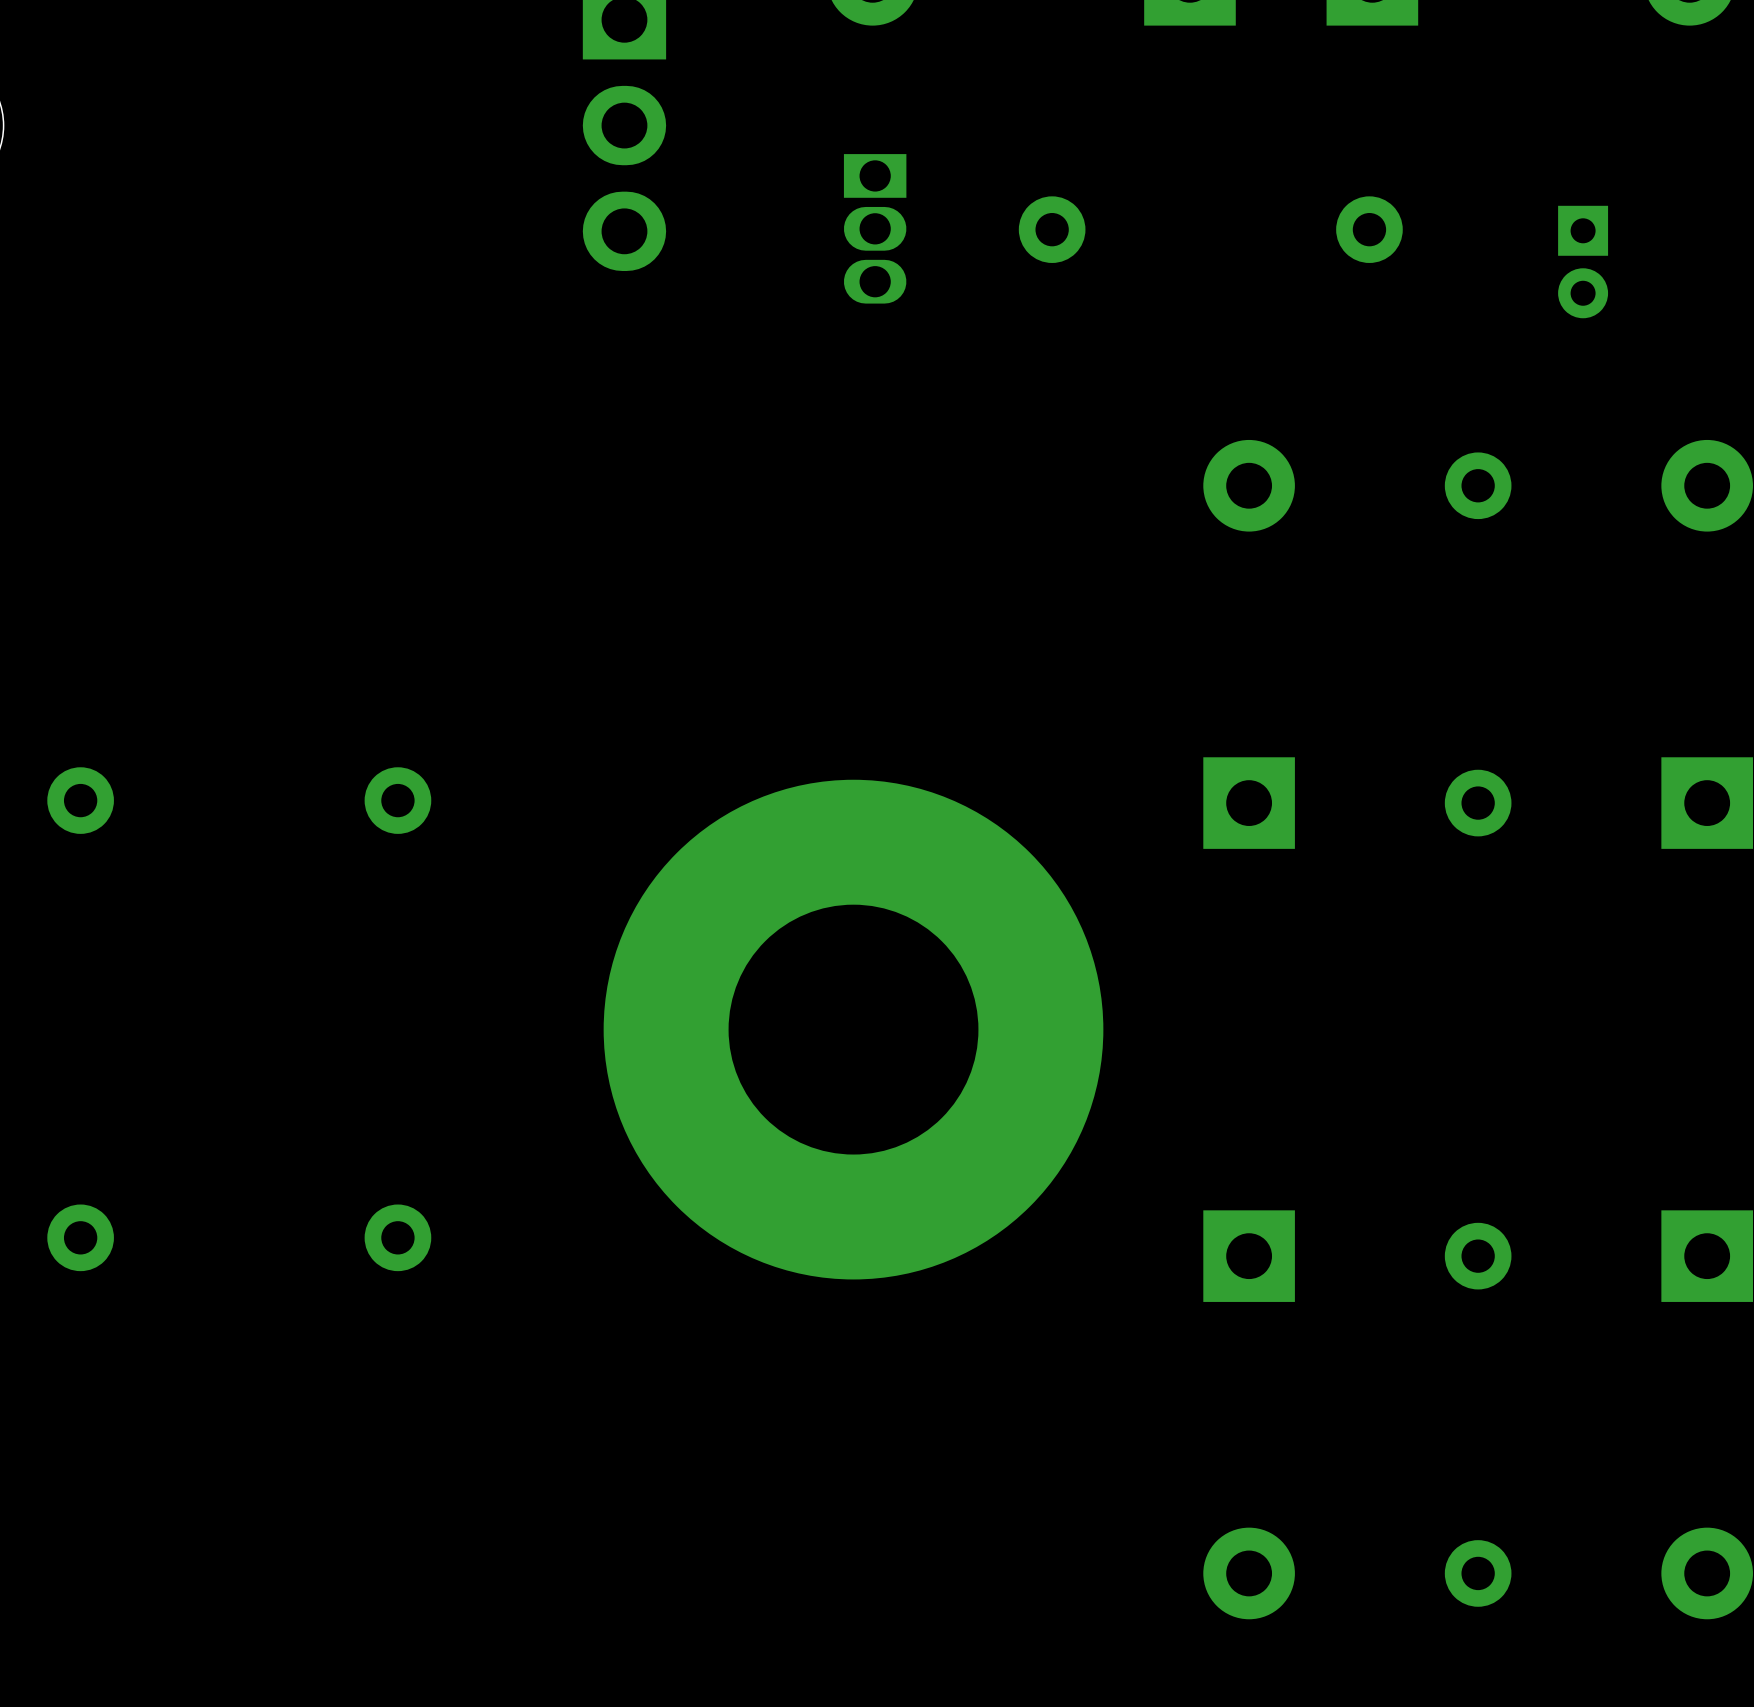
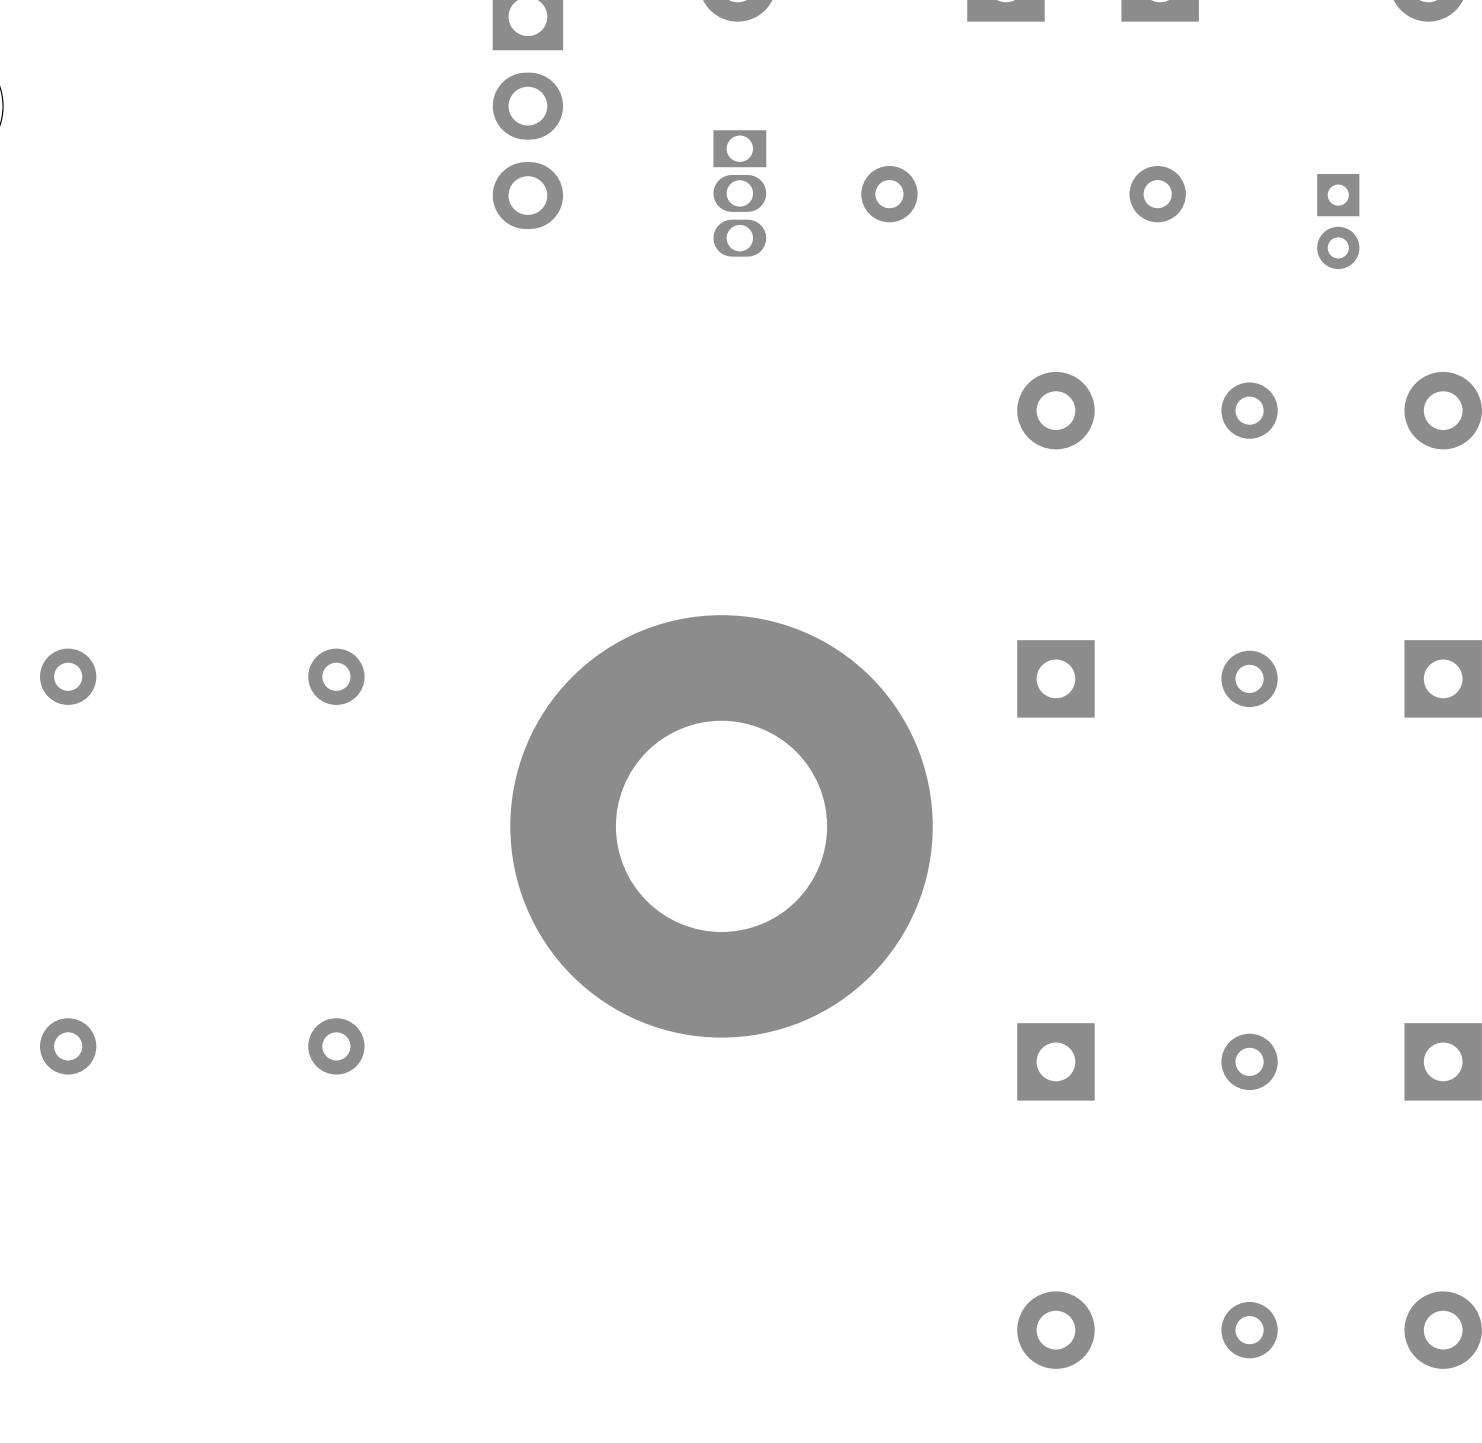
part position: (853, 1029) -> (721, 826)

